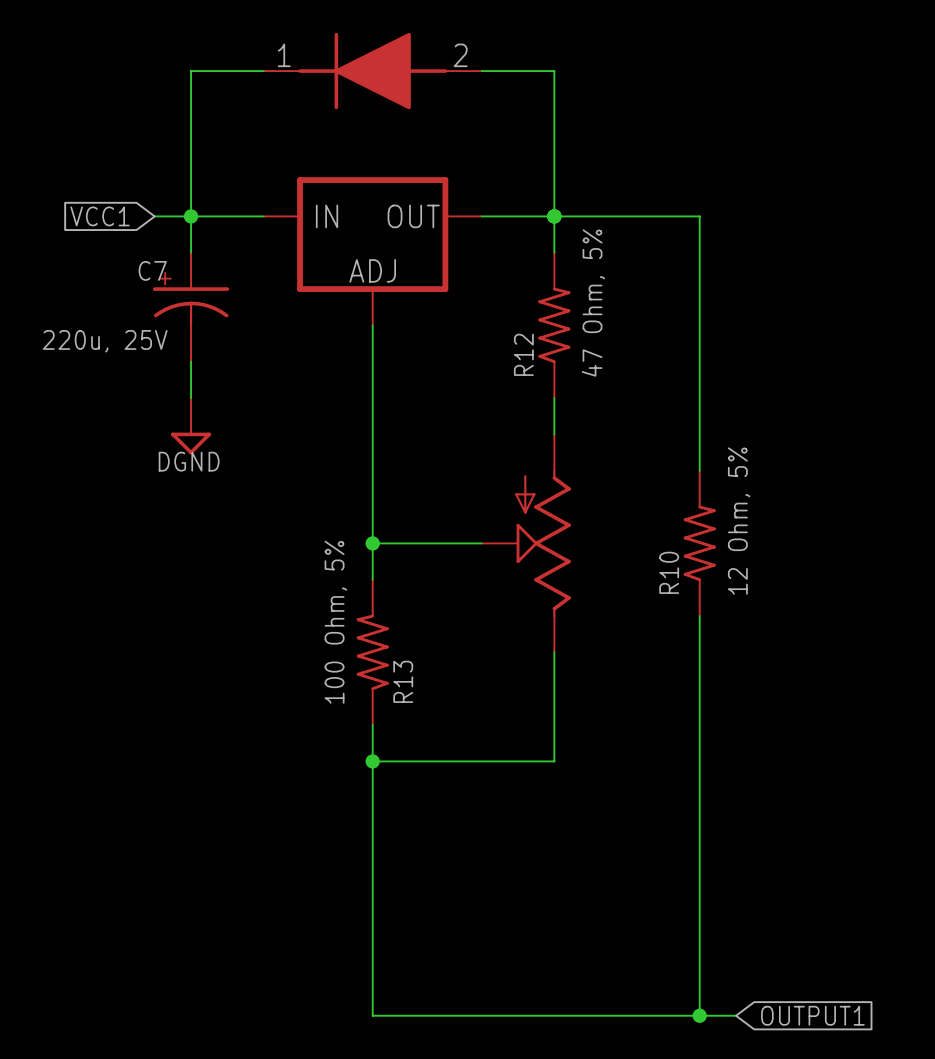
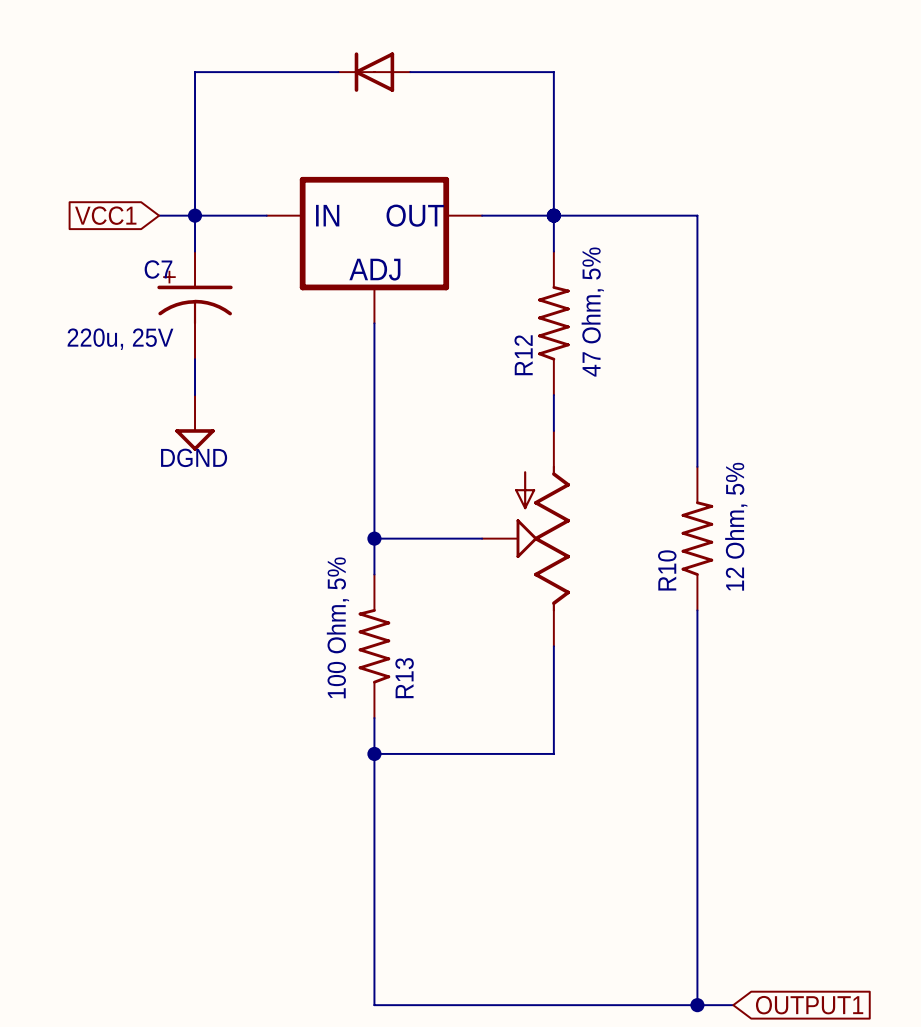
part symbol: [263, 32, 482, 110] -> [338, 52, 411, 92]

